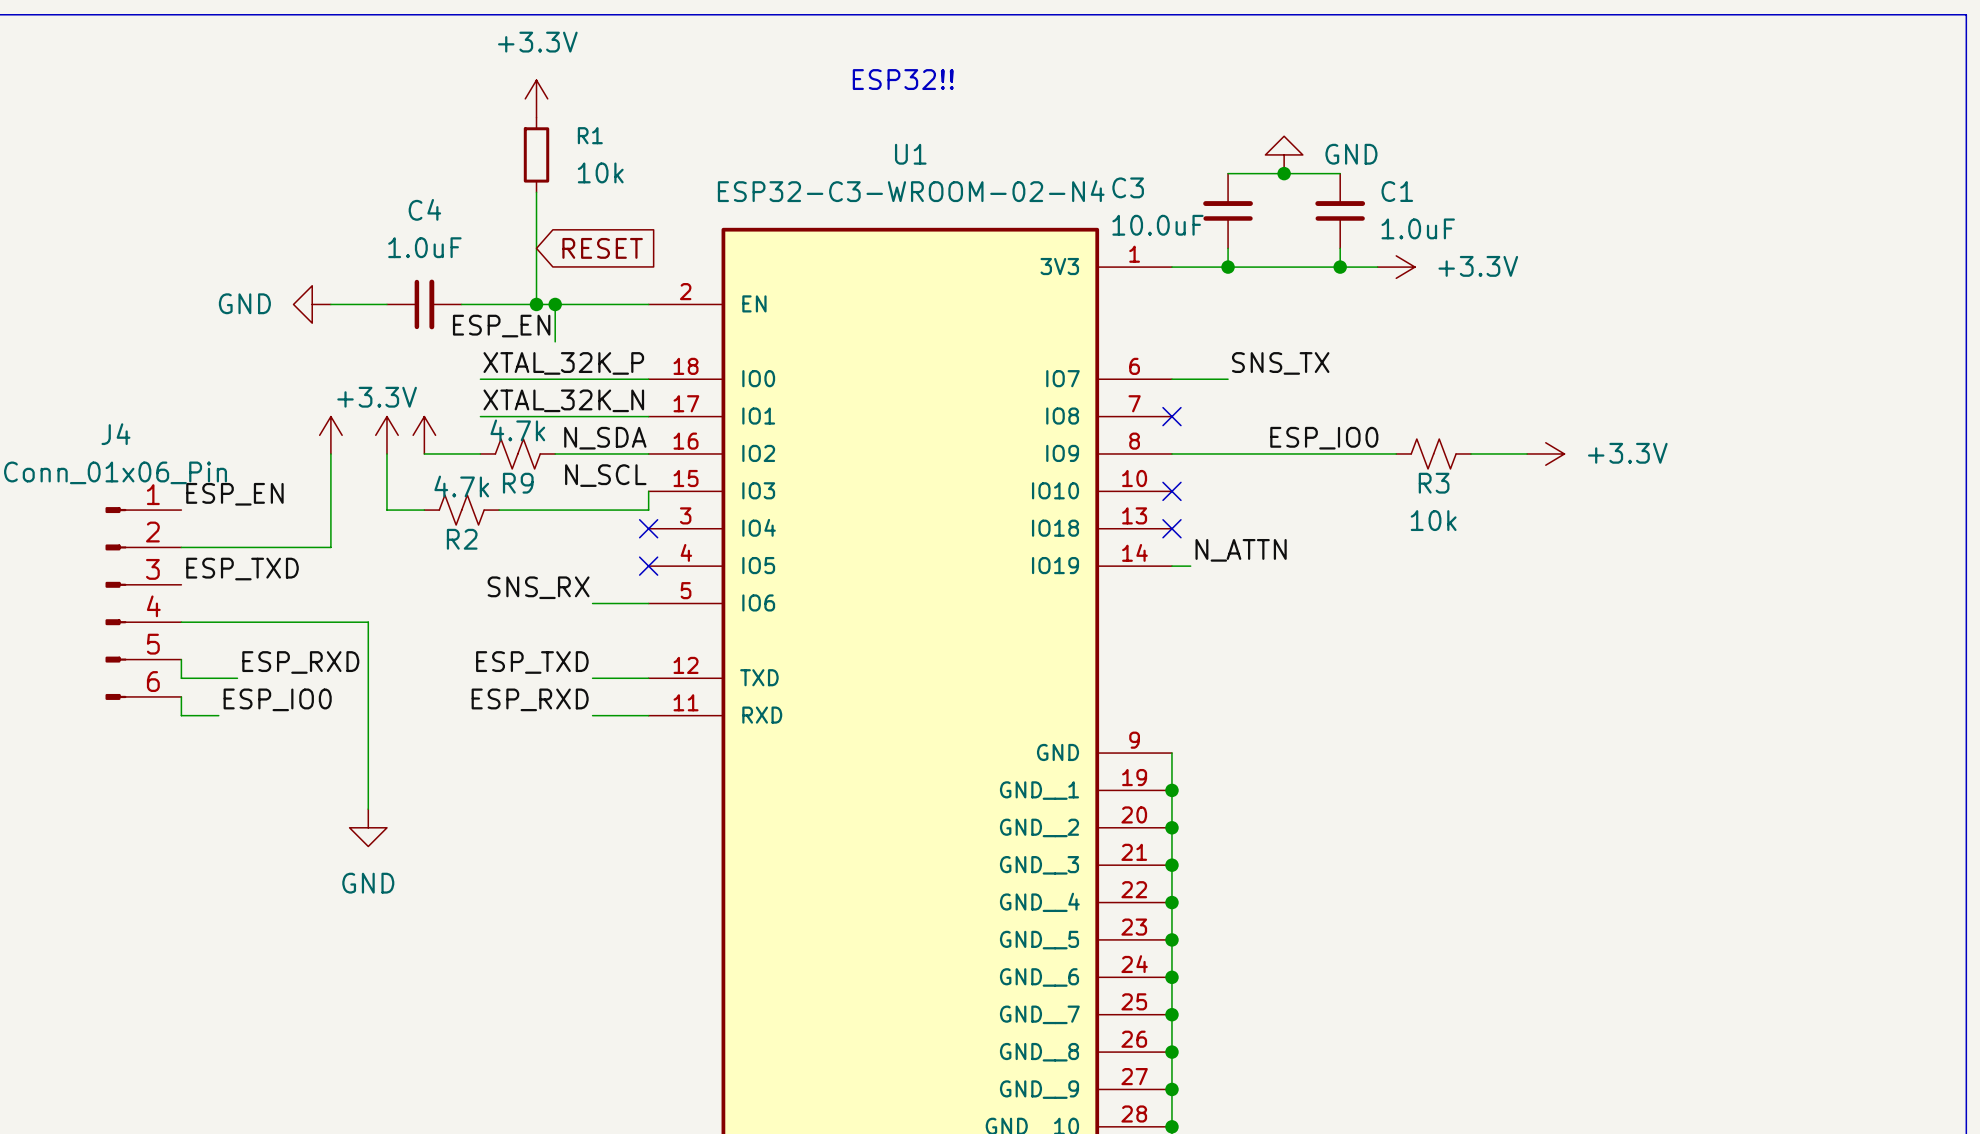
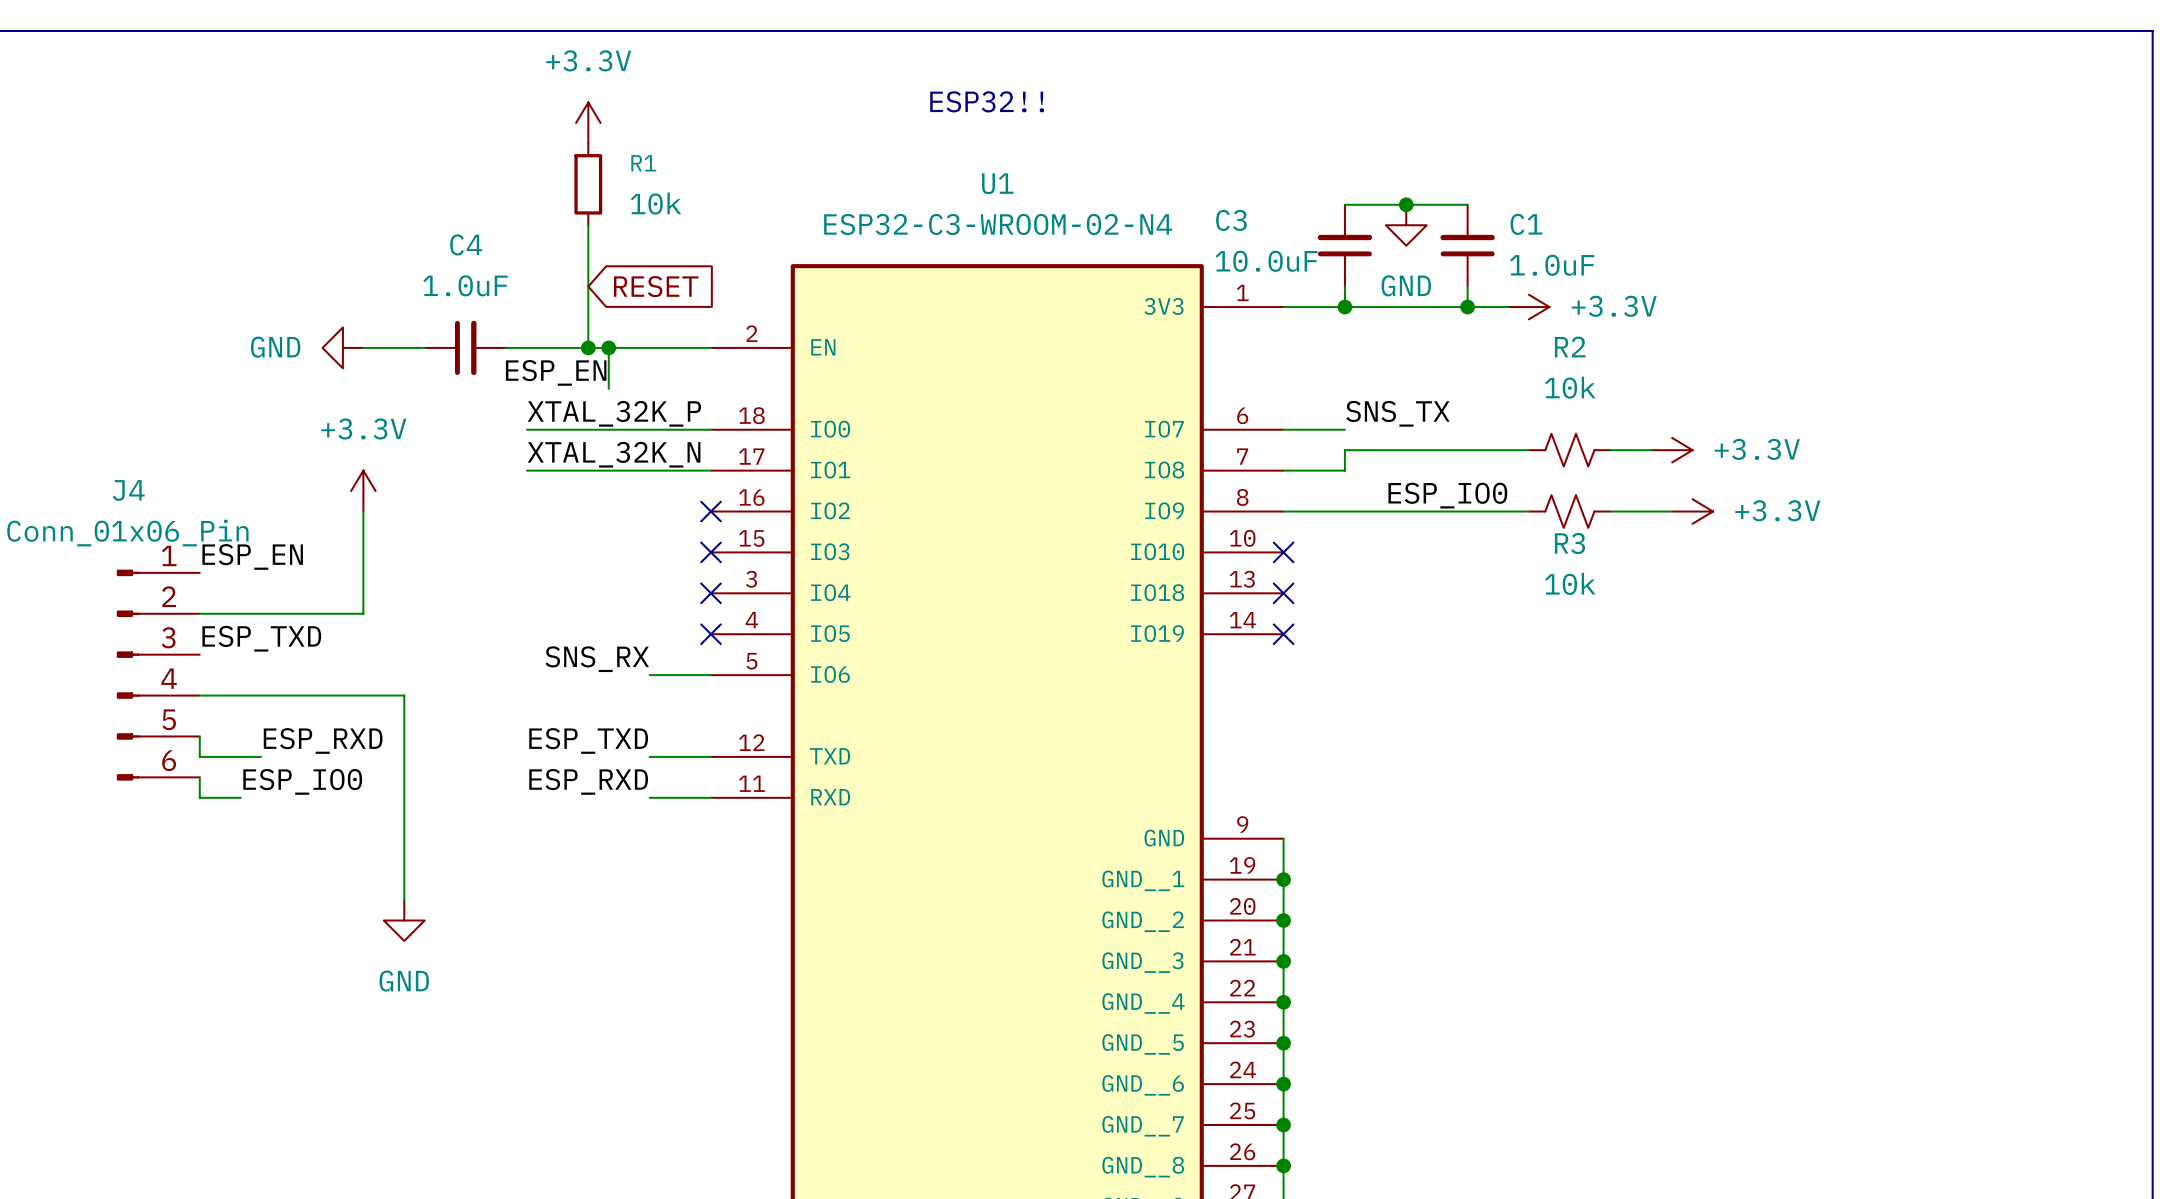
power symbol rotation: 0° (1284, 154) -> 180° (1406, 225)
power symbol position: GND (1284, 154) -> GND (1406, 225)
power symbol text position: GND (1351, 154) -> GND (1406, 285)
power symbol text position: +3.3V (377, 397) -> +3.3V (363, 428)
wire: none -> (1528, 450) (1344, 450) (1344, 470) (1283, 470)
wire: none -> (1610, 450) (1651, 450)
power symbol: none -> +3.3V (1672, 450)
no-connect mark: (1171, 416) -> none
power symbol: (386, 435) -> none
power symbol: (424, 435) -> none
label: N_SDA (605, 438) -> none
wire: (386, 453) (386, 510) (424, 510) -> none
wire: (424, 453) (480, 453) -> none
R9: 4.7k (517, 453) -> none
wire: (555, 453) (648, 453) -> none
no-connect mark: none -> (711, 511)
label: N_SCL (605, 475) -> none
R2 value: 4.7k (461, 486) -> 10k (1570, 387)
wire: (648, 491) (648, 510) (499, 510) -> none
no-connect mark: none -> (711, 552)
R2 position: (461, 510) -> (1569, 450)
R2 name position: R2 (462, 539) -> R2 (1570, 346)
label: N_ATTN (1241, 550) -> none
wire: (1171, 566) (1190, 566) -> none
no-connect mark: none -> (1283, 634)

